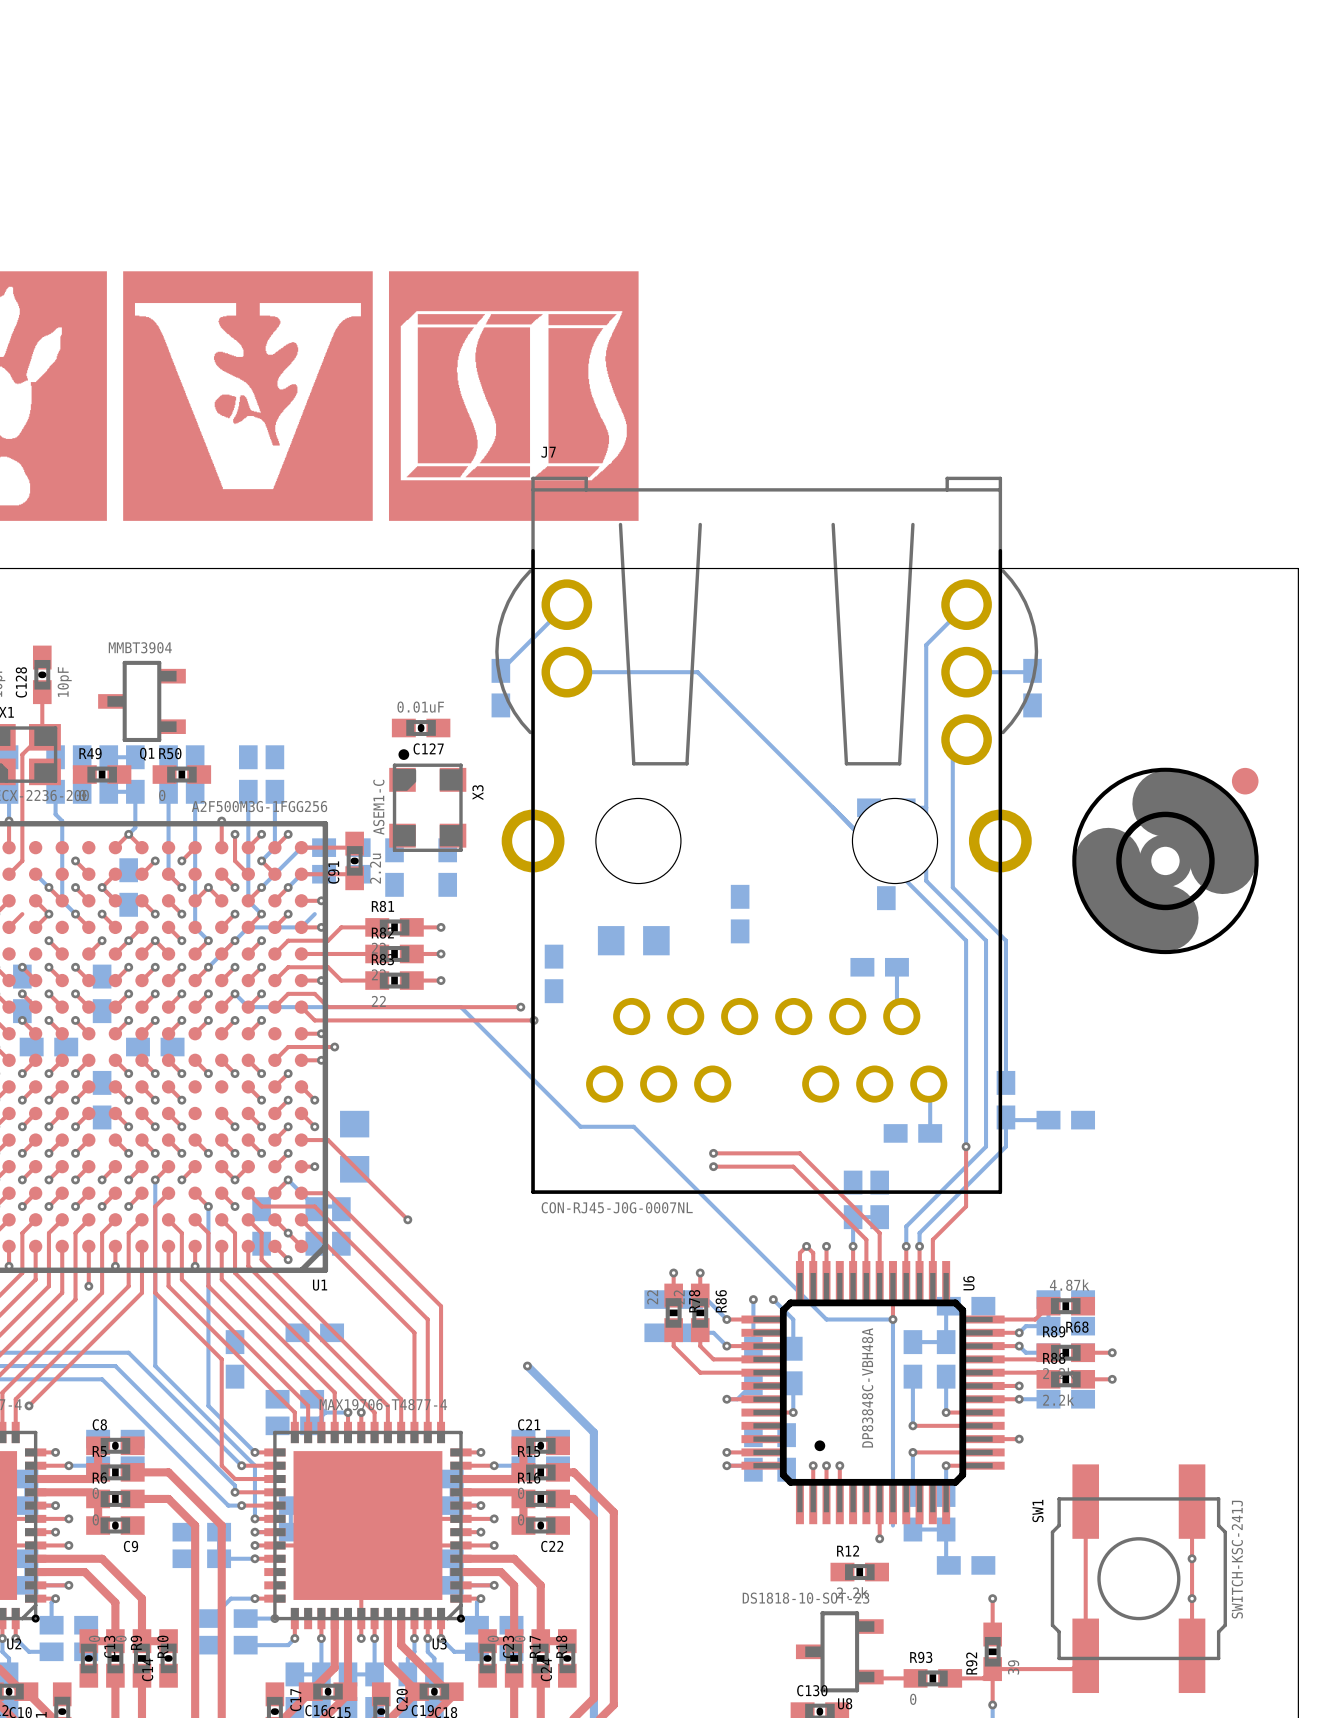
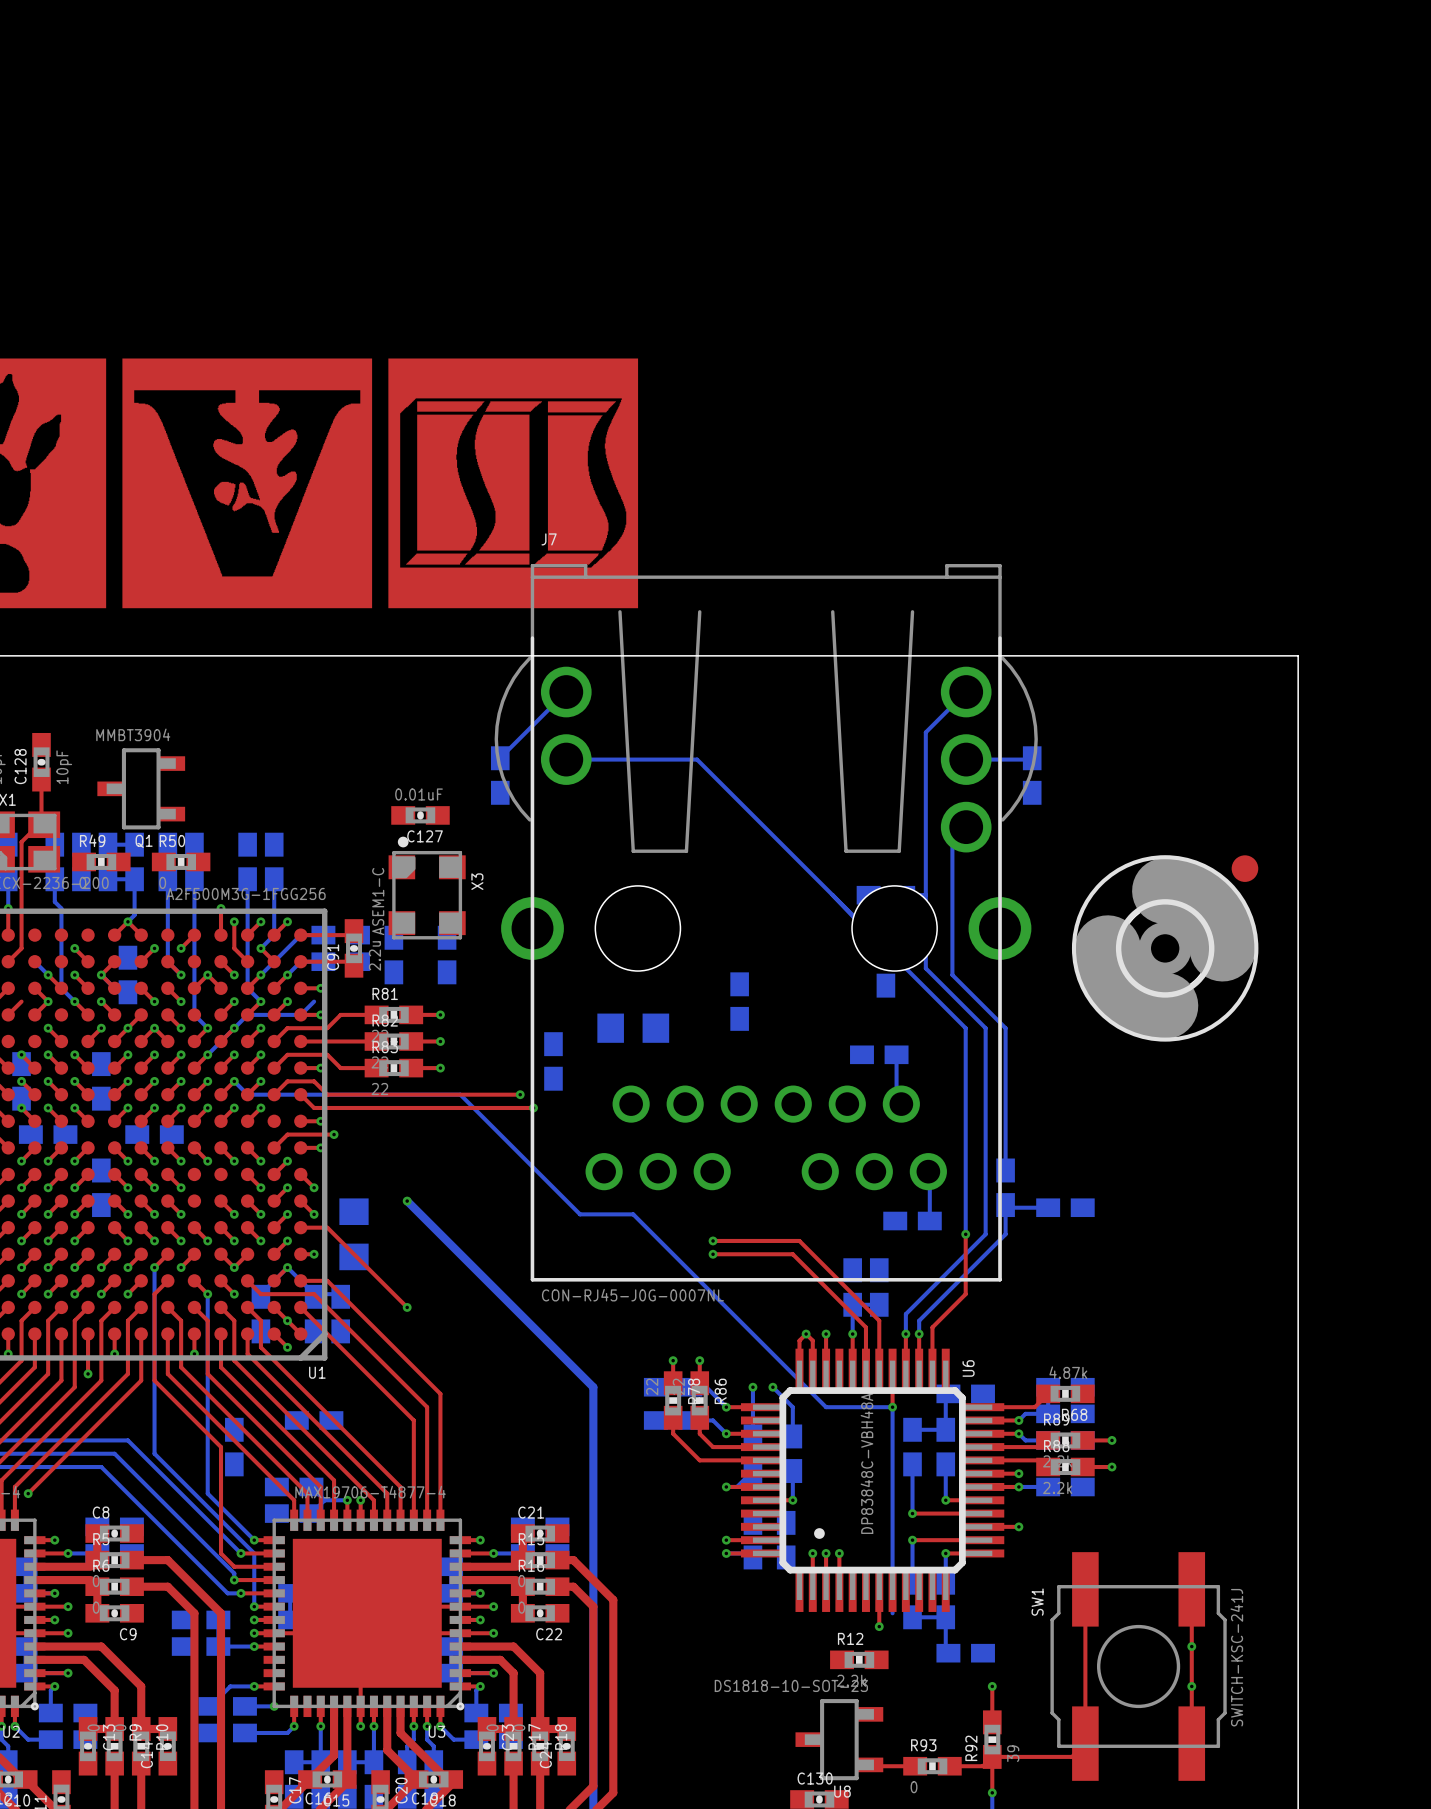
via: none -> (407, 1201)
bottom track: (527, 1366) (593, 1432) -> (407, 1201) (593, 1387) (593, 1520)
via: (527, 1366) -> none

